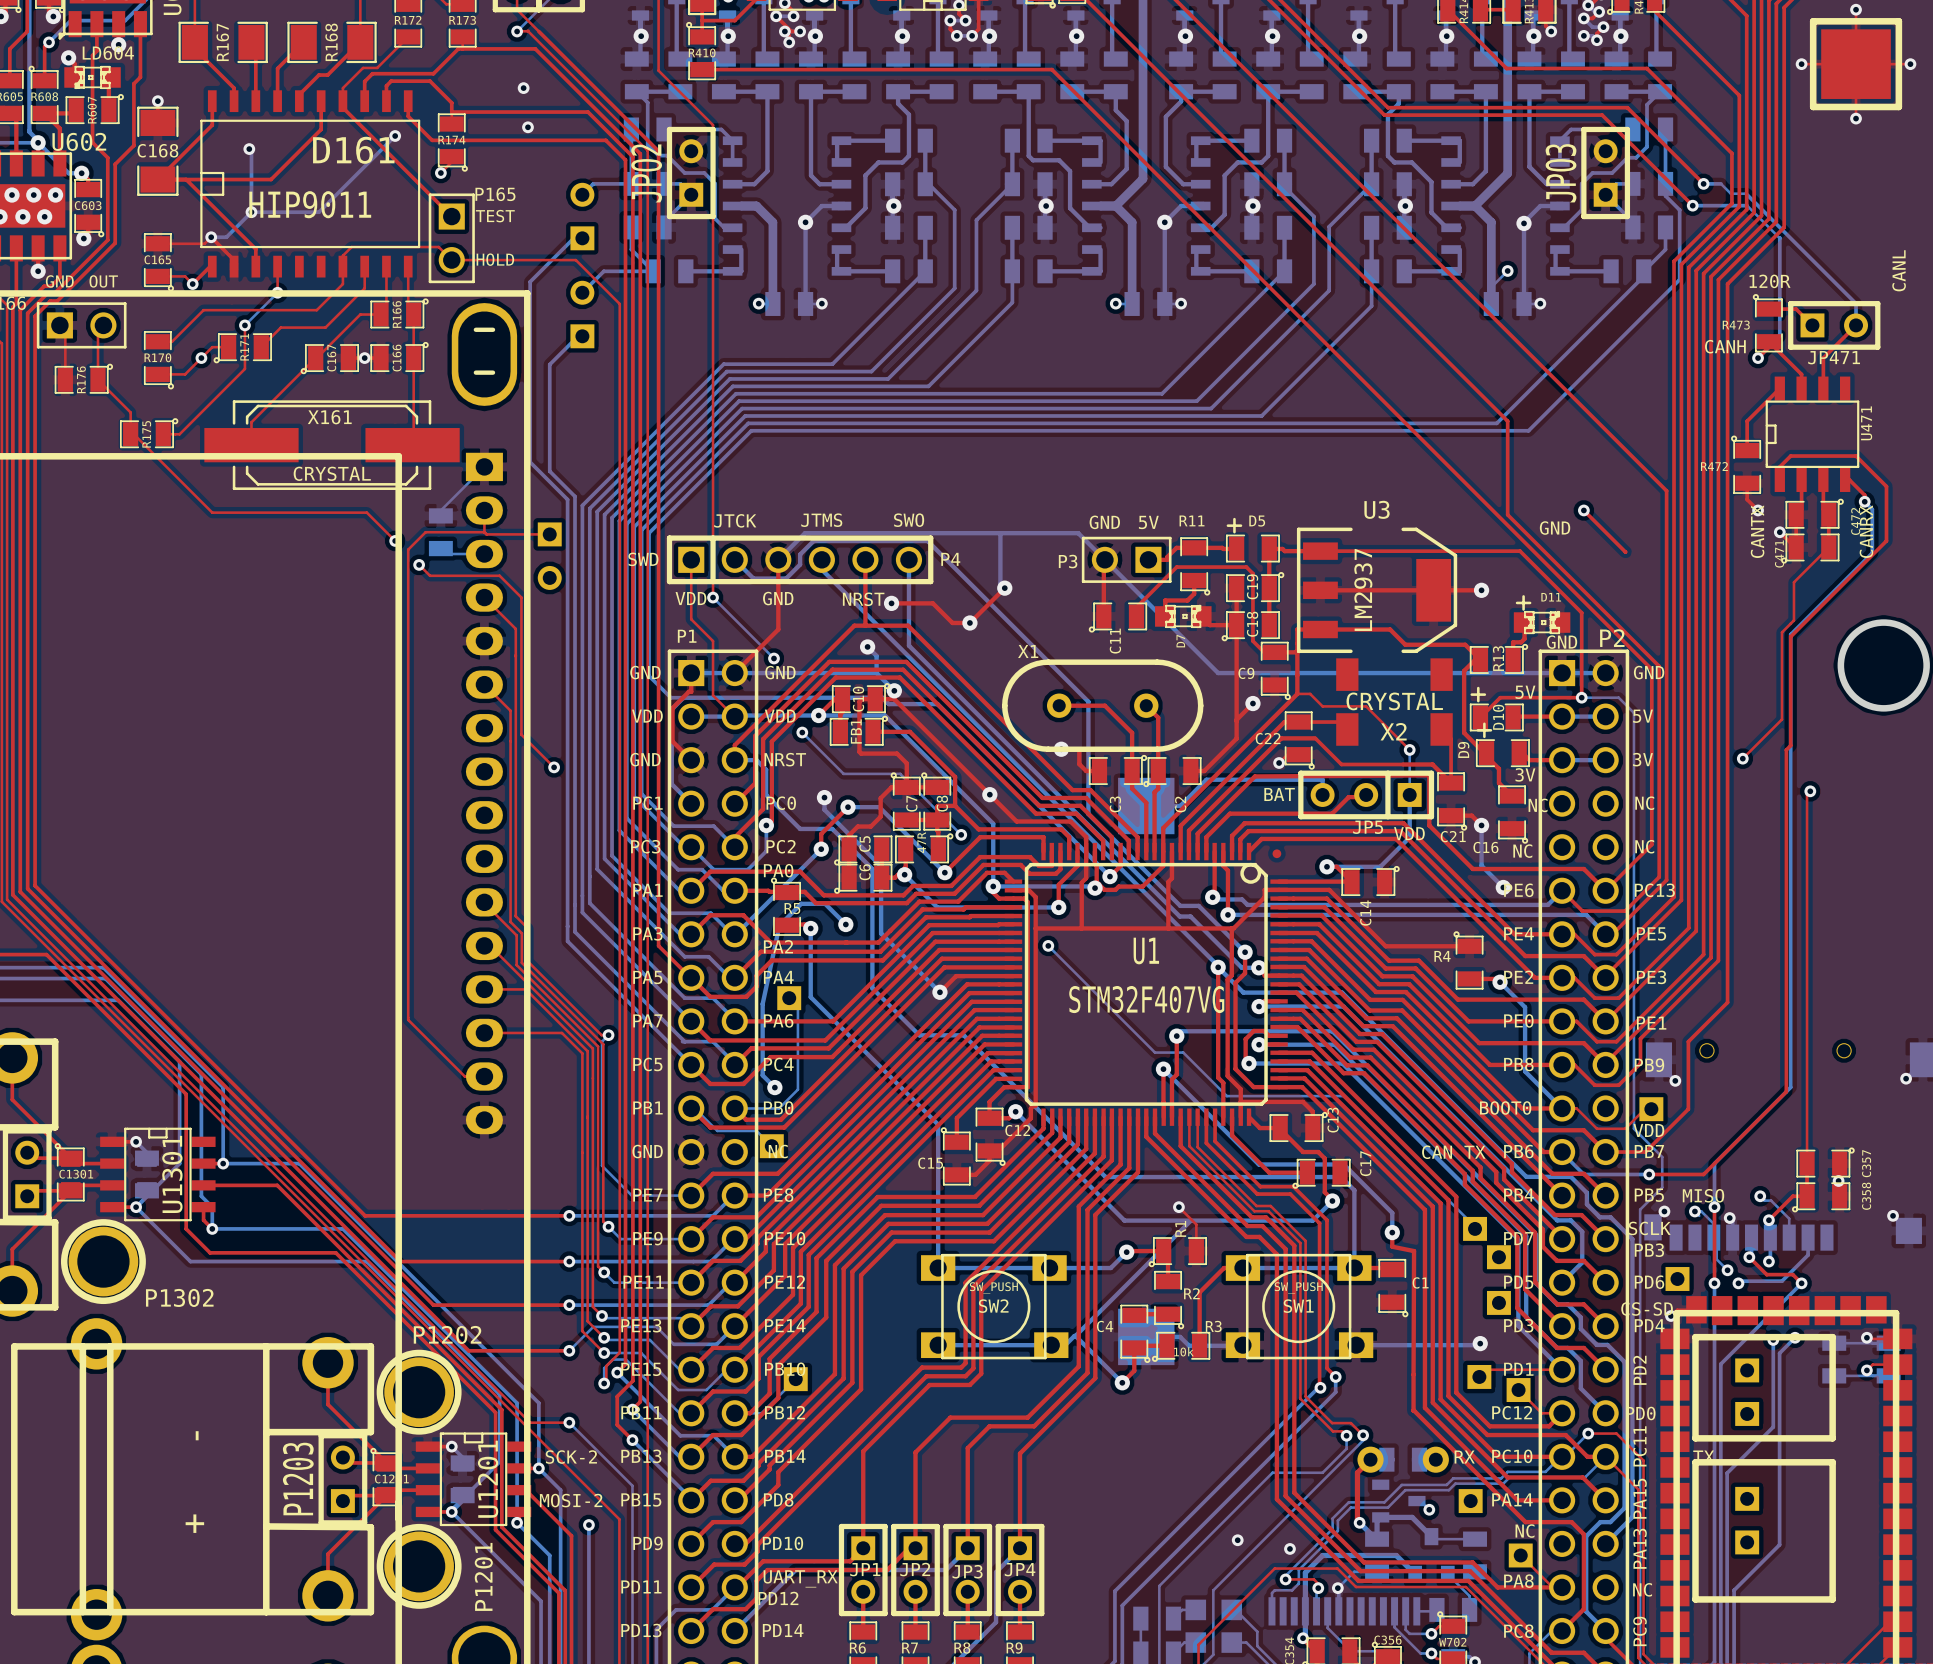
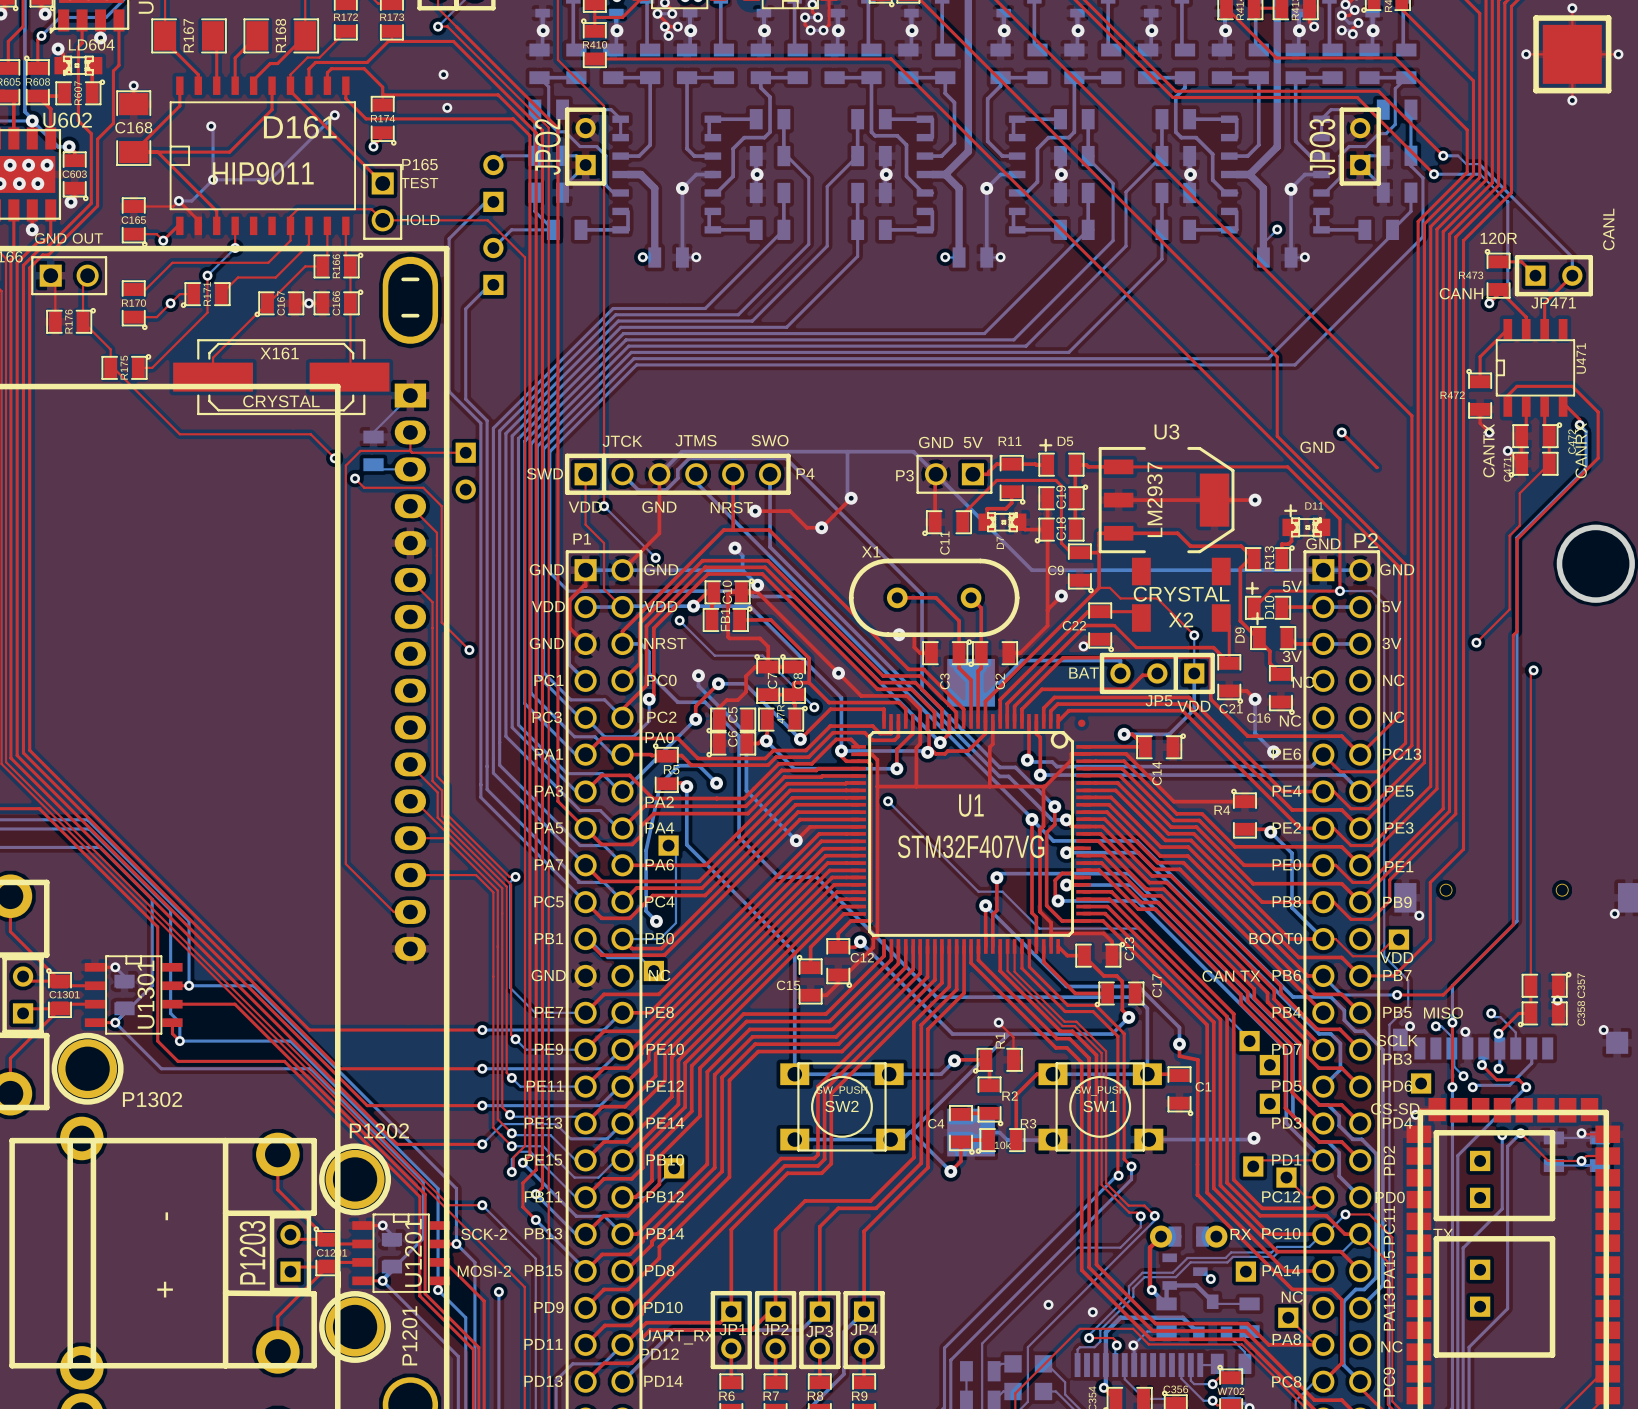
top track: none -> (1520, 1133) (1548, 1160) (1581, 1160)

